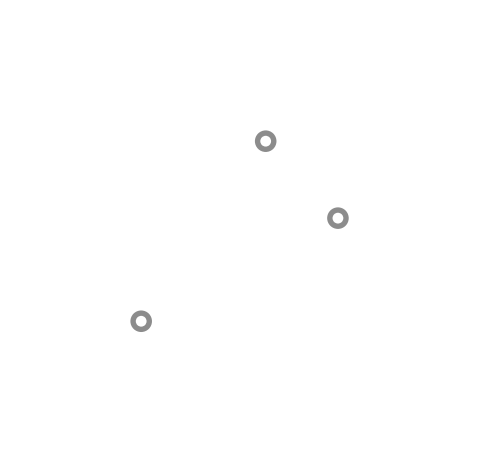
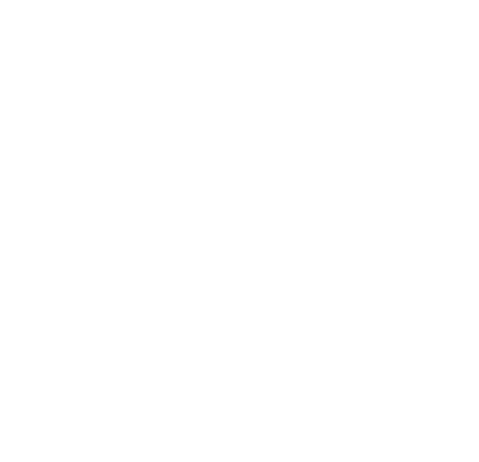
via: (265, 141) -> none
via: (337, 218) -> none
via: (141, 321) -> none

